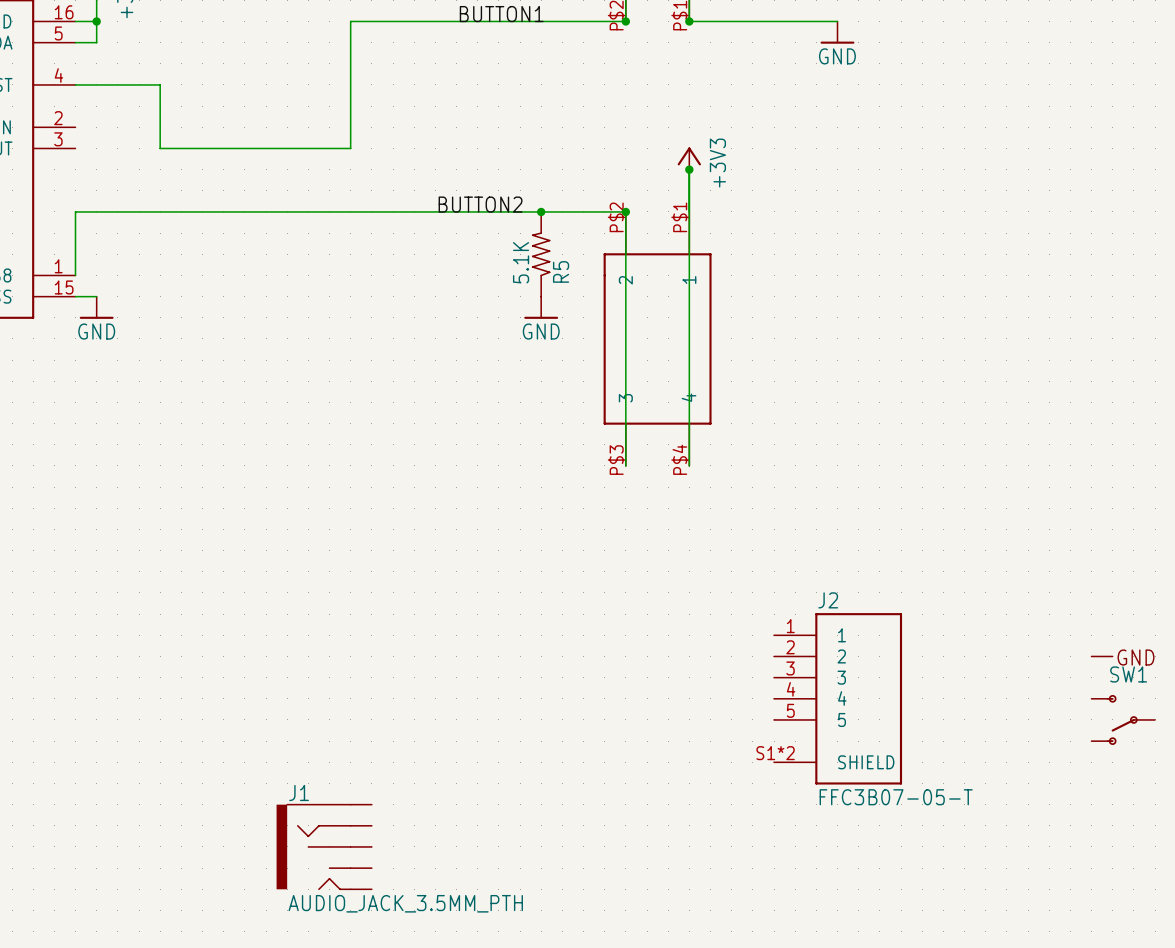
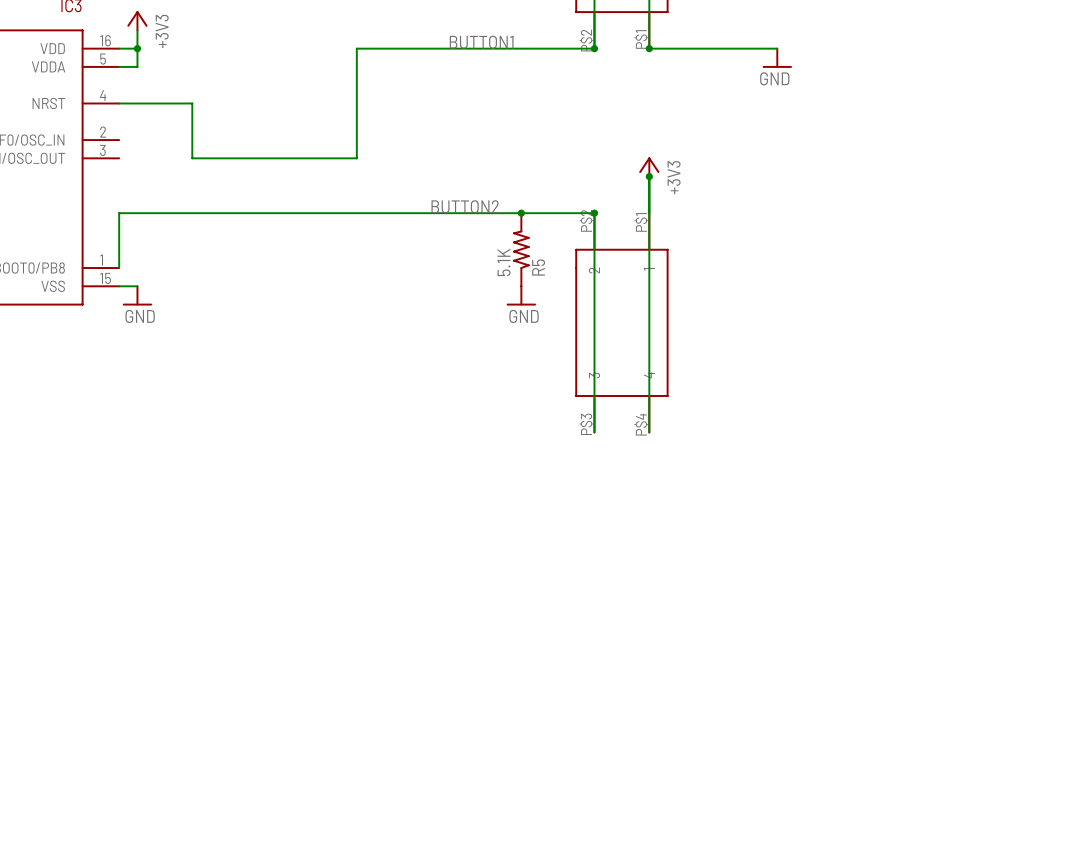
J2: FFC3B07-05-T (838, 698) -> none
SW1: (1123, 700) -> none
J1: AUDIO_JACK_3.5MM_PTH (324, 846) -> none

